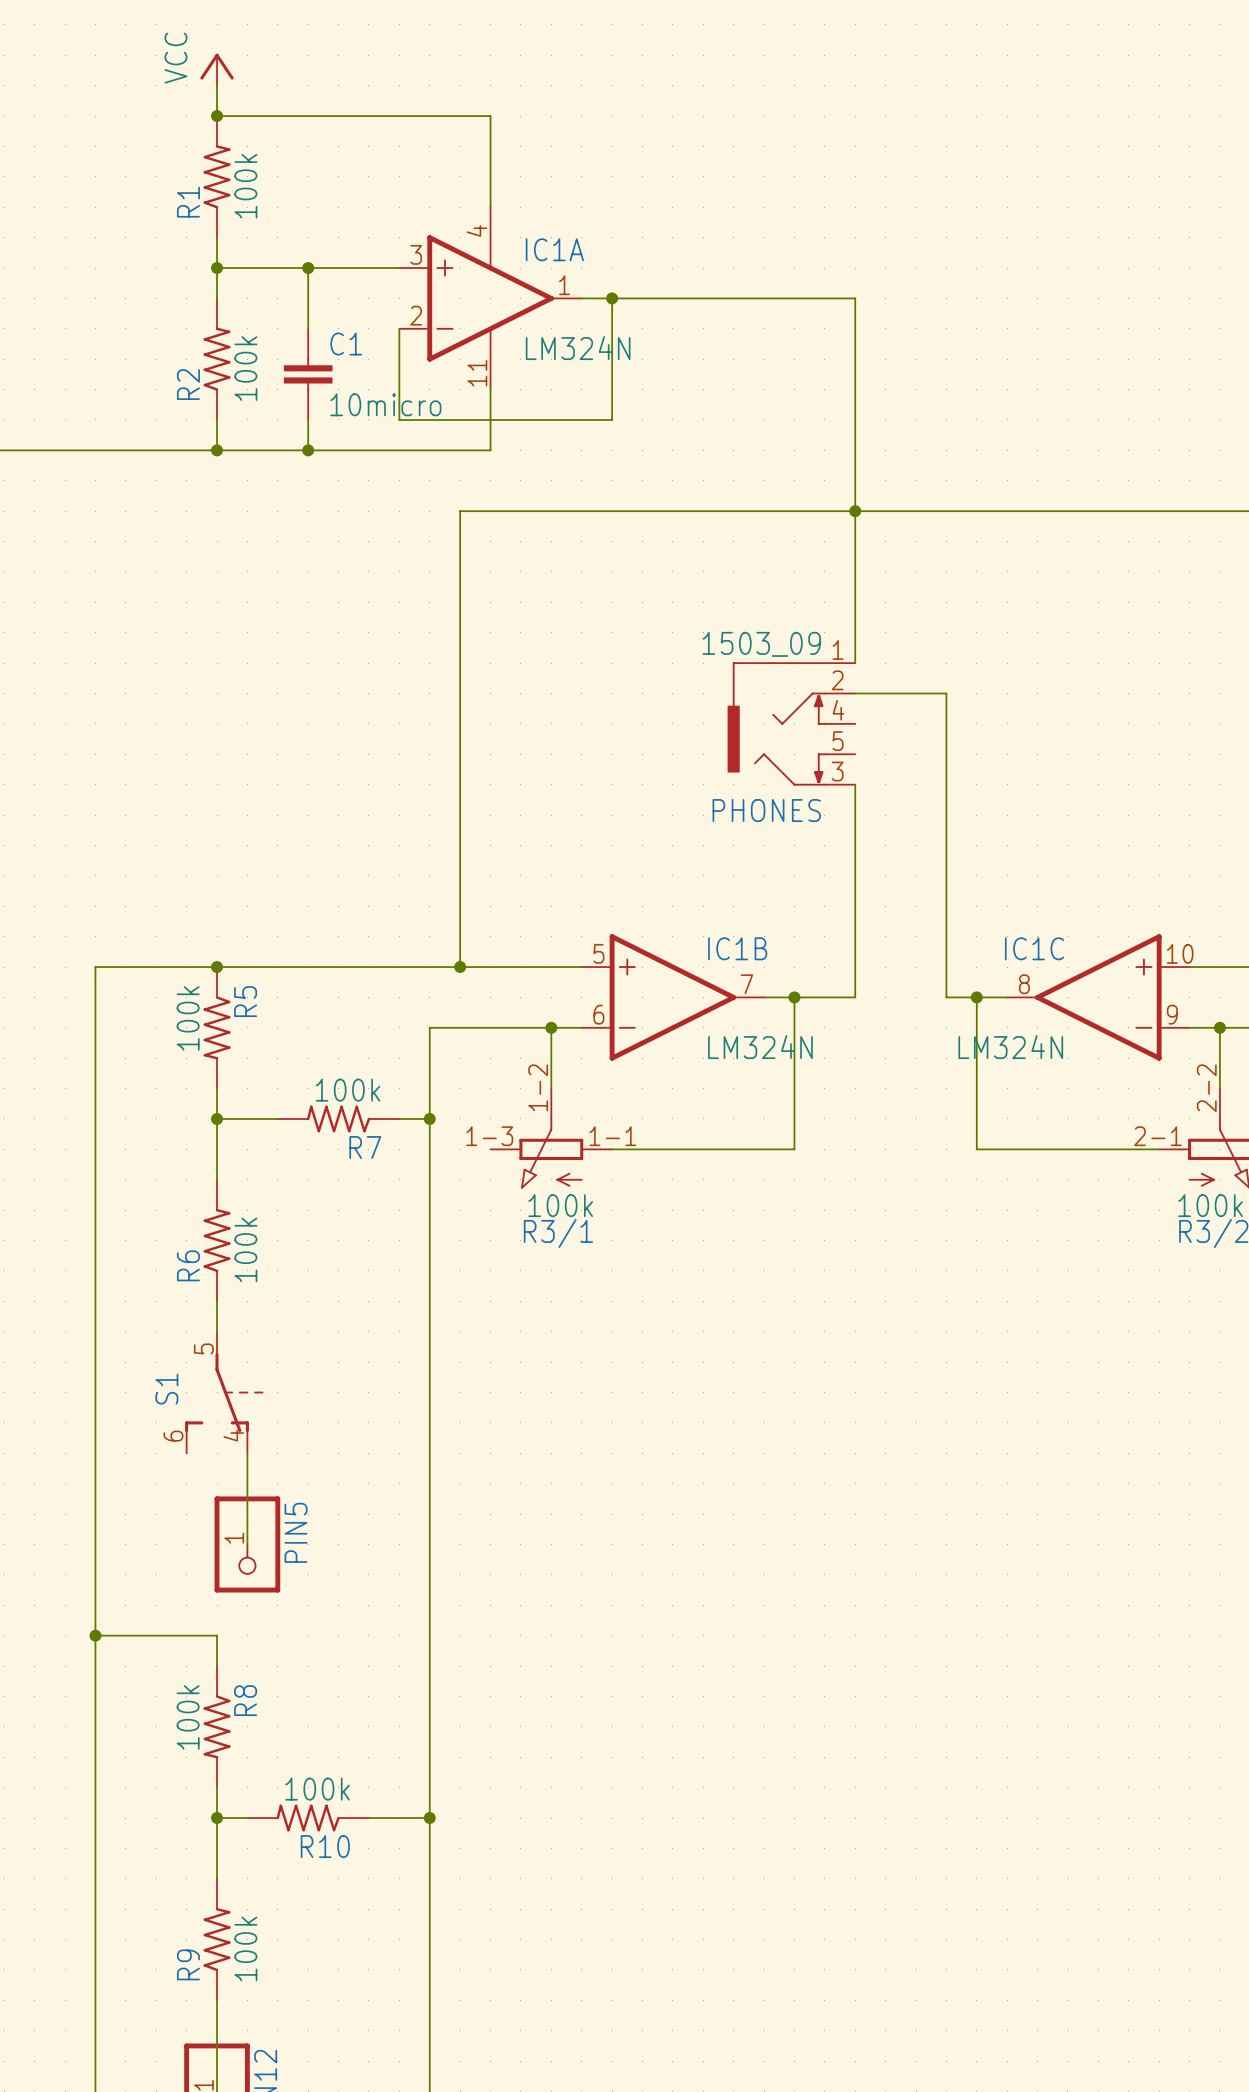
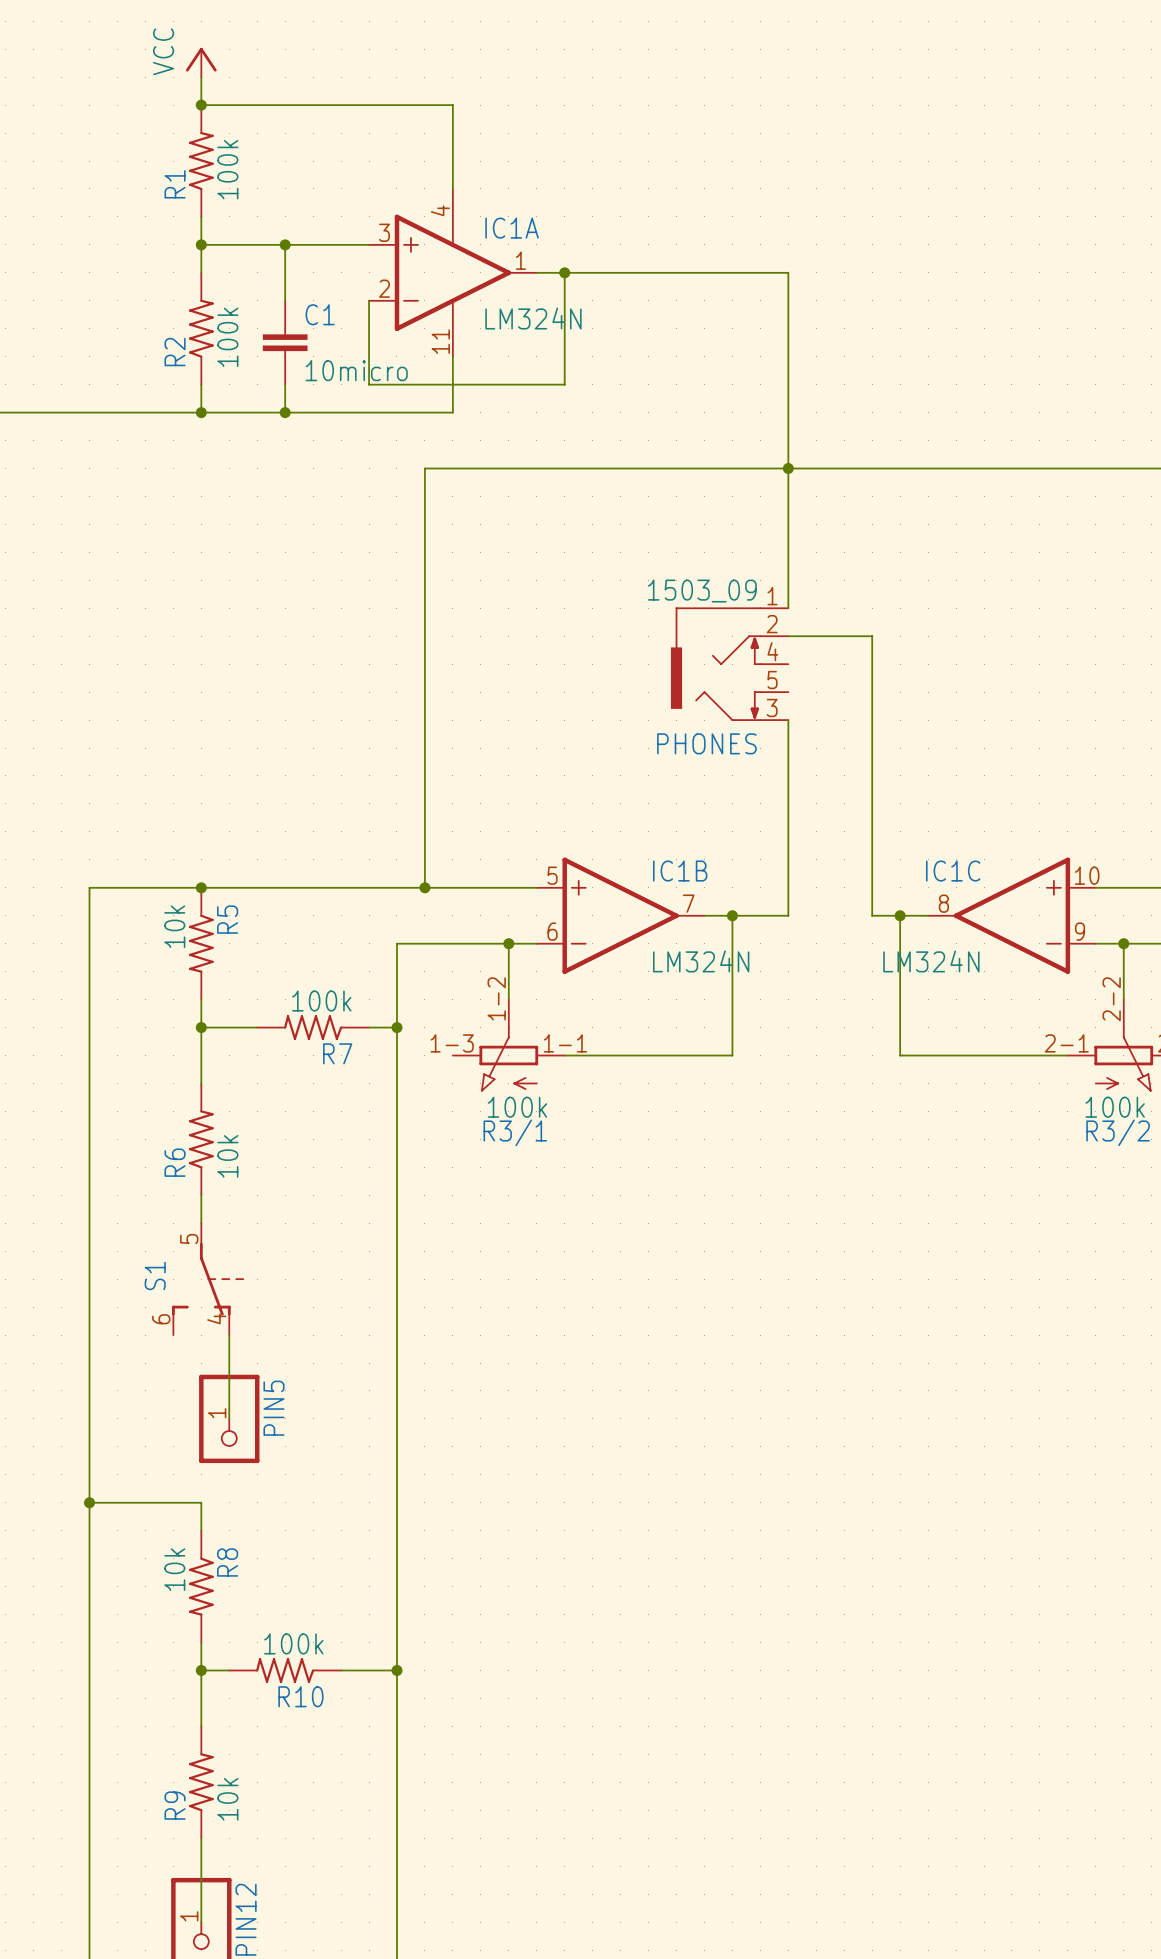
R5 value: 100k (188, 1018) -> 10k (174, 926)
R6 value: 100k (245, 1249) -> 10k (227, 1156)
R8 value: 100k (188, 1717) -> 10k (174, 1569)
R9 value: 100k (245, 1948) -> 10k (227, 1799)

